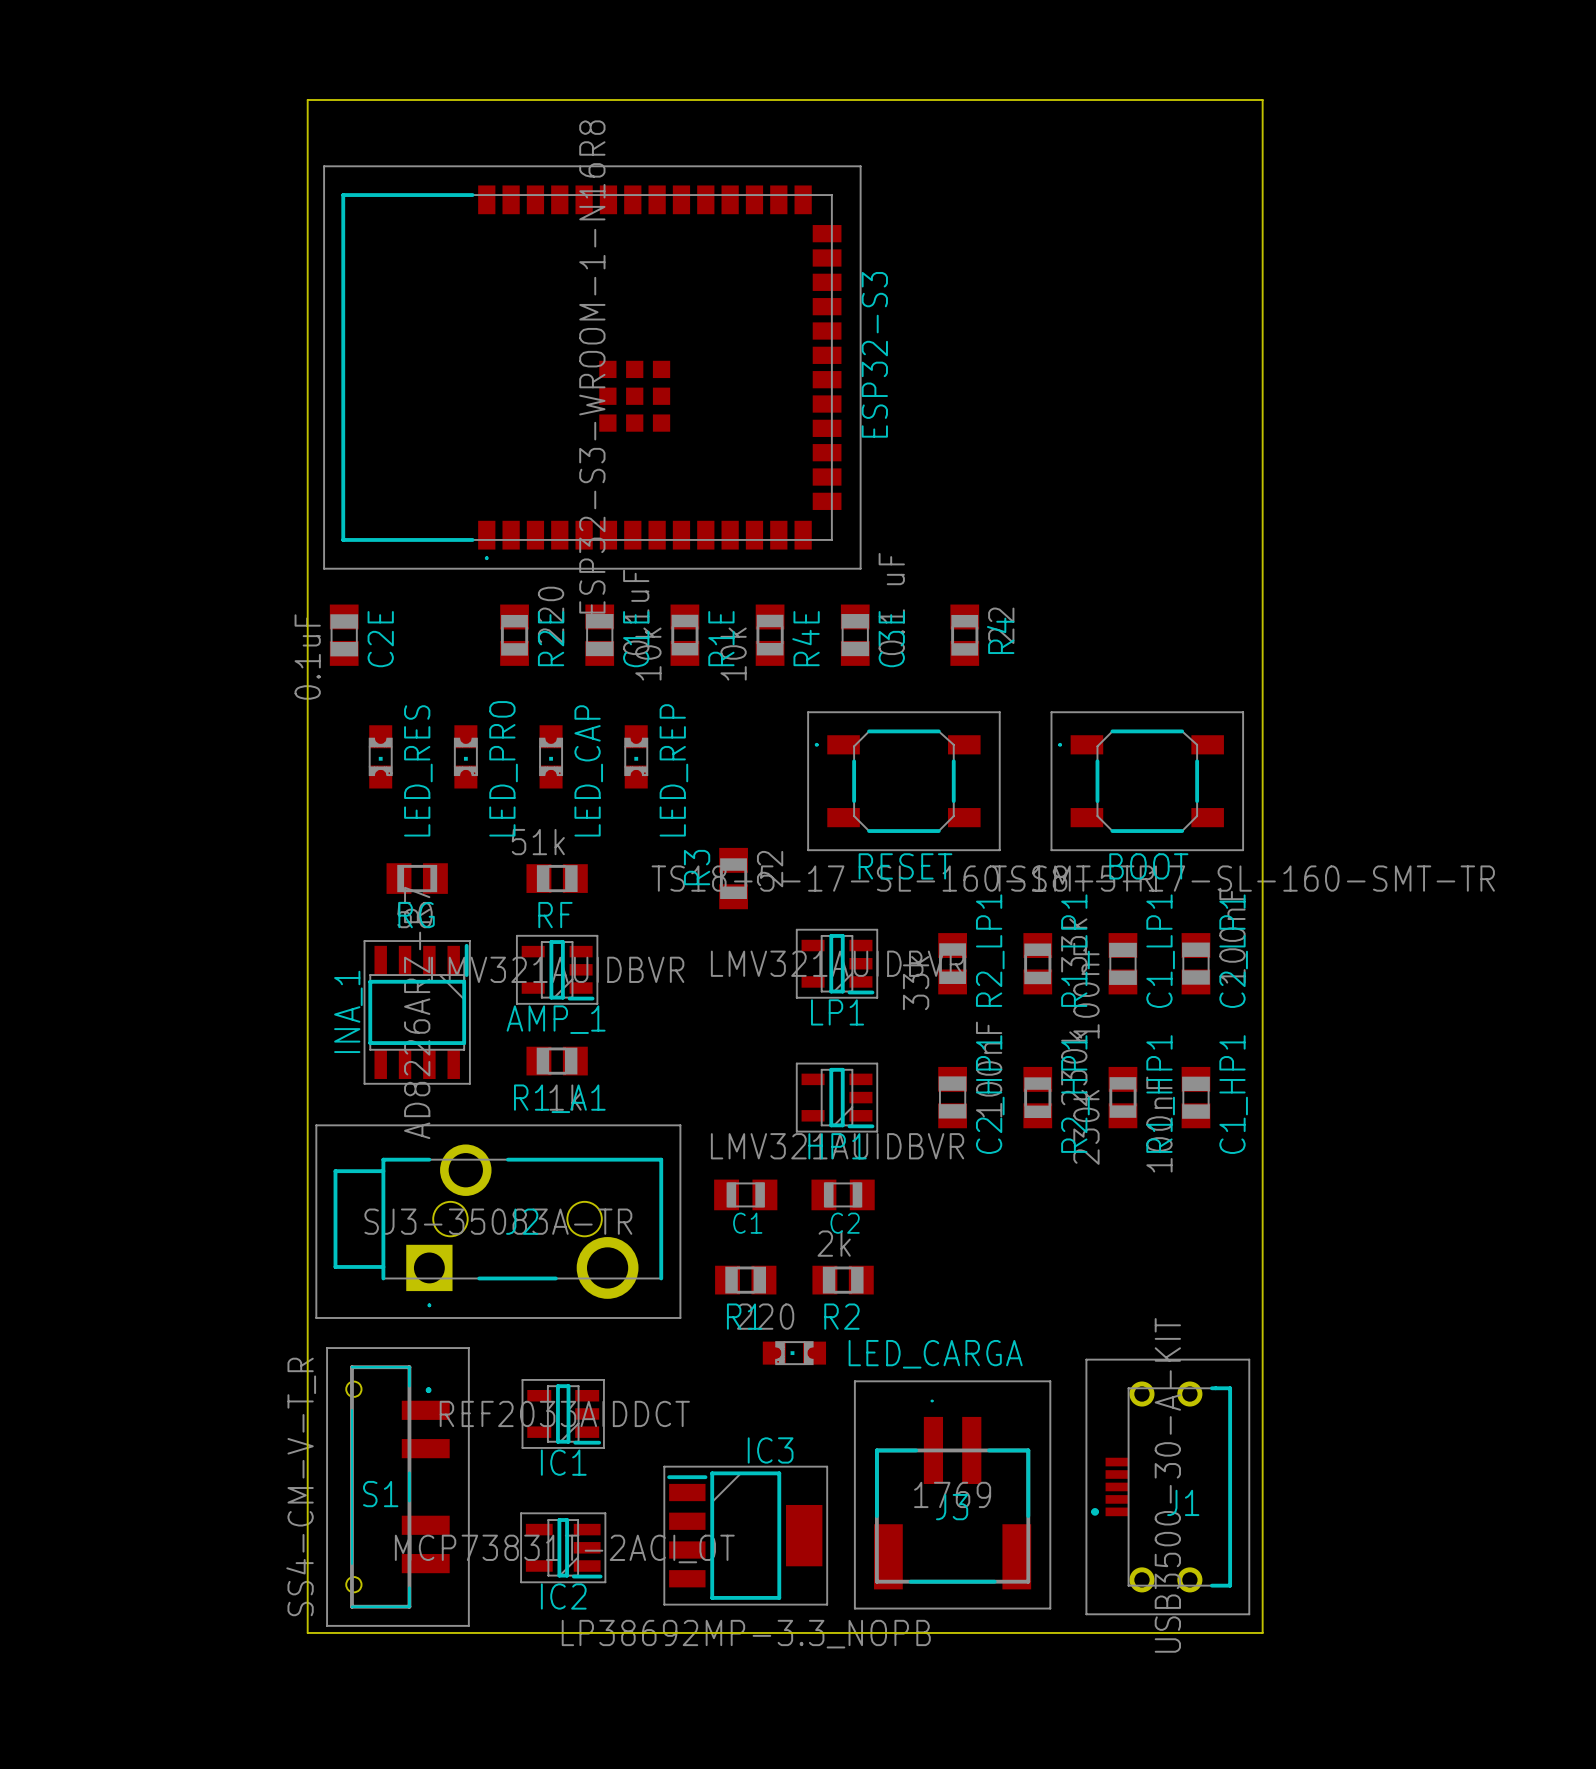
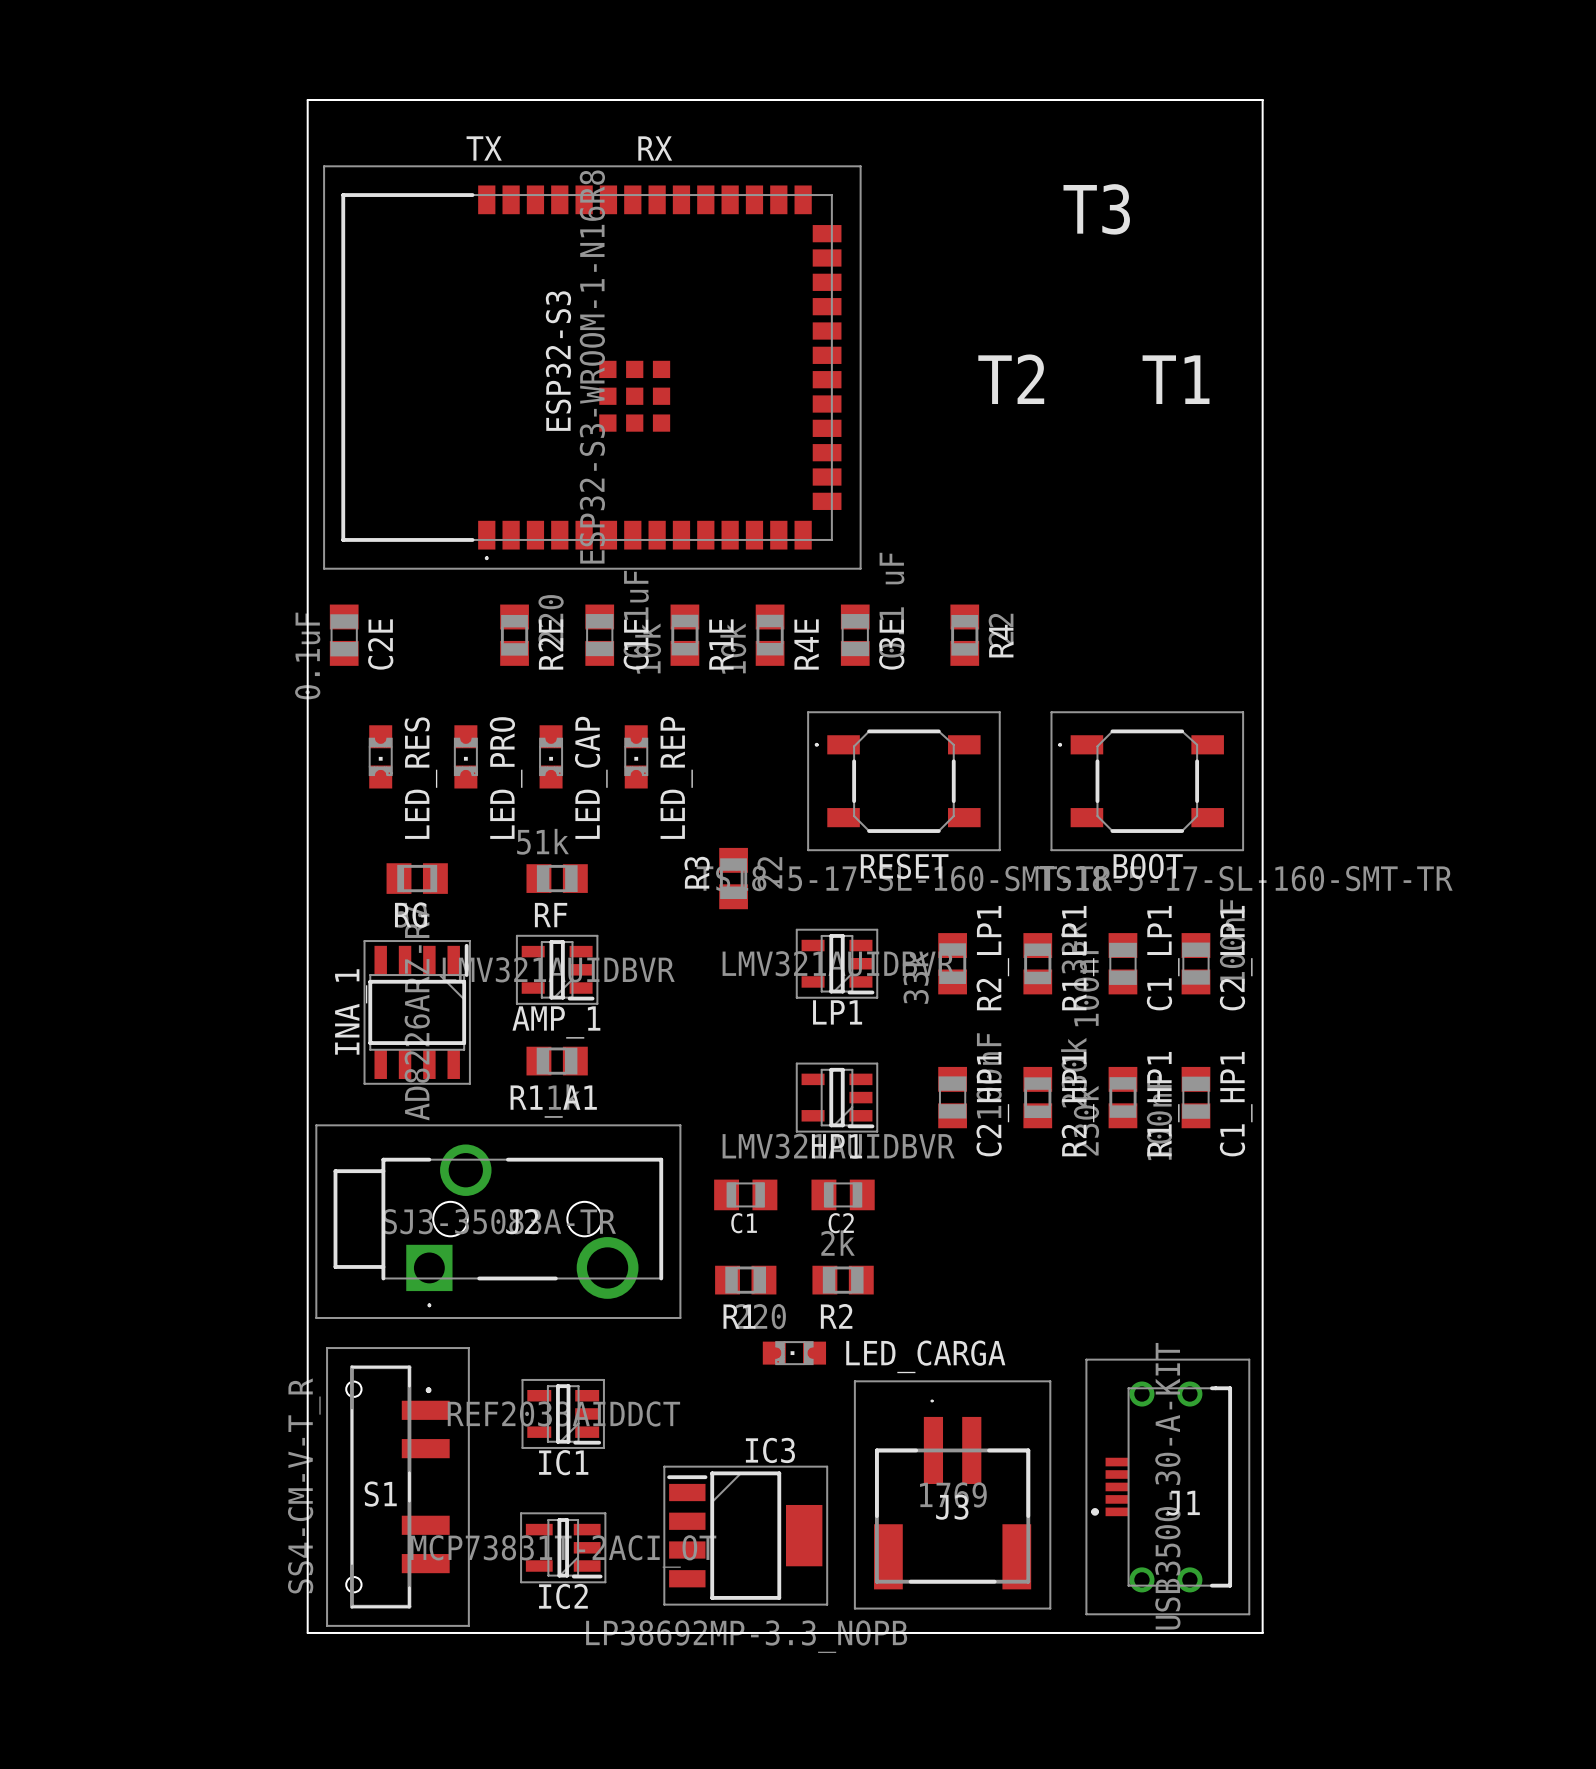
text: none -> TX (484, 148)
text: none -> RX (655, 148)
text: none -> T3 (1096, 209)
ESP32-S3 name position: ESP32-S3 (874, 354) -> ESP32-S3 (558, 361)
text: none -> T2 (1011, 379)
text: none -> T1 (1176, 379)

